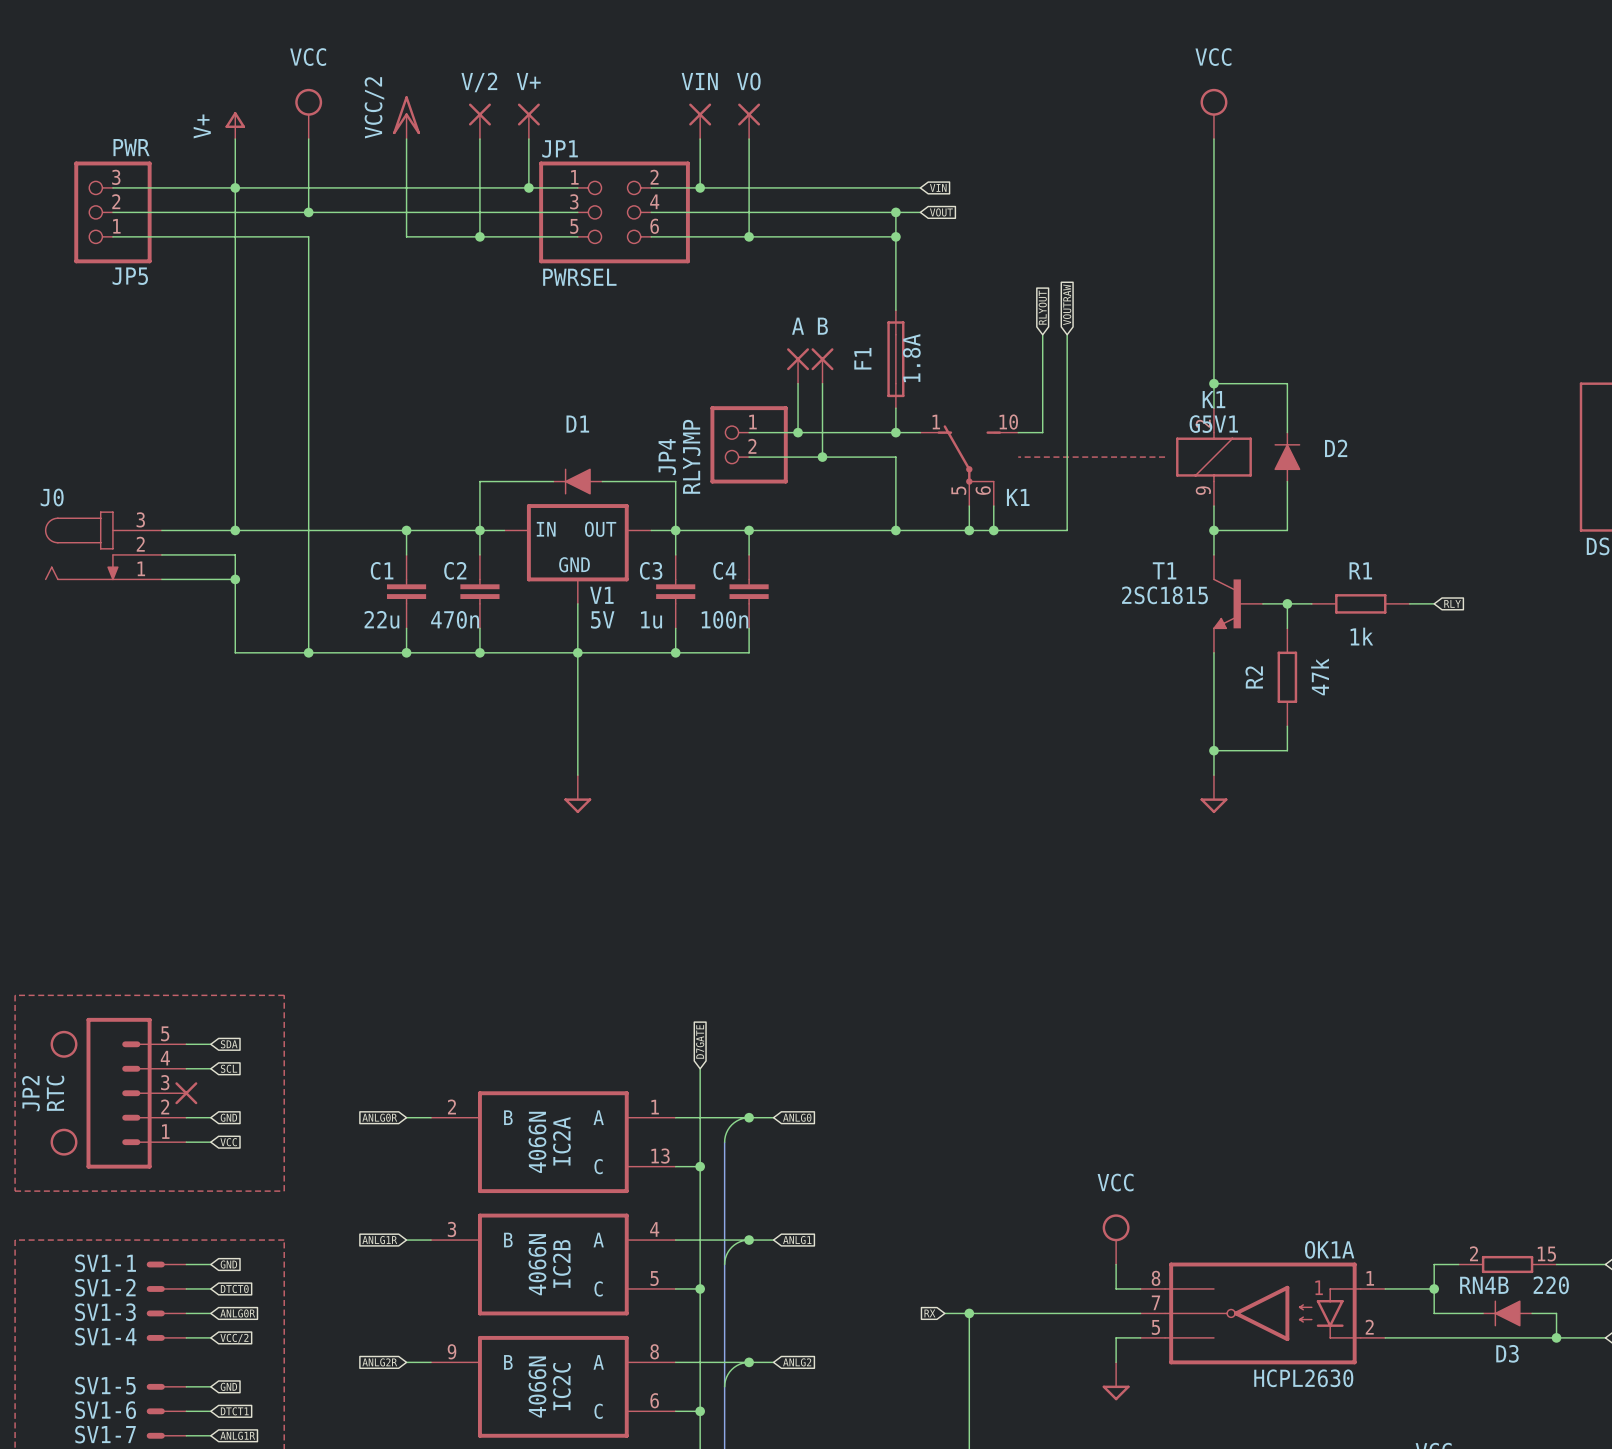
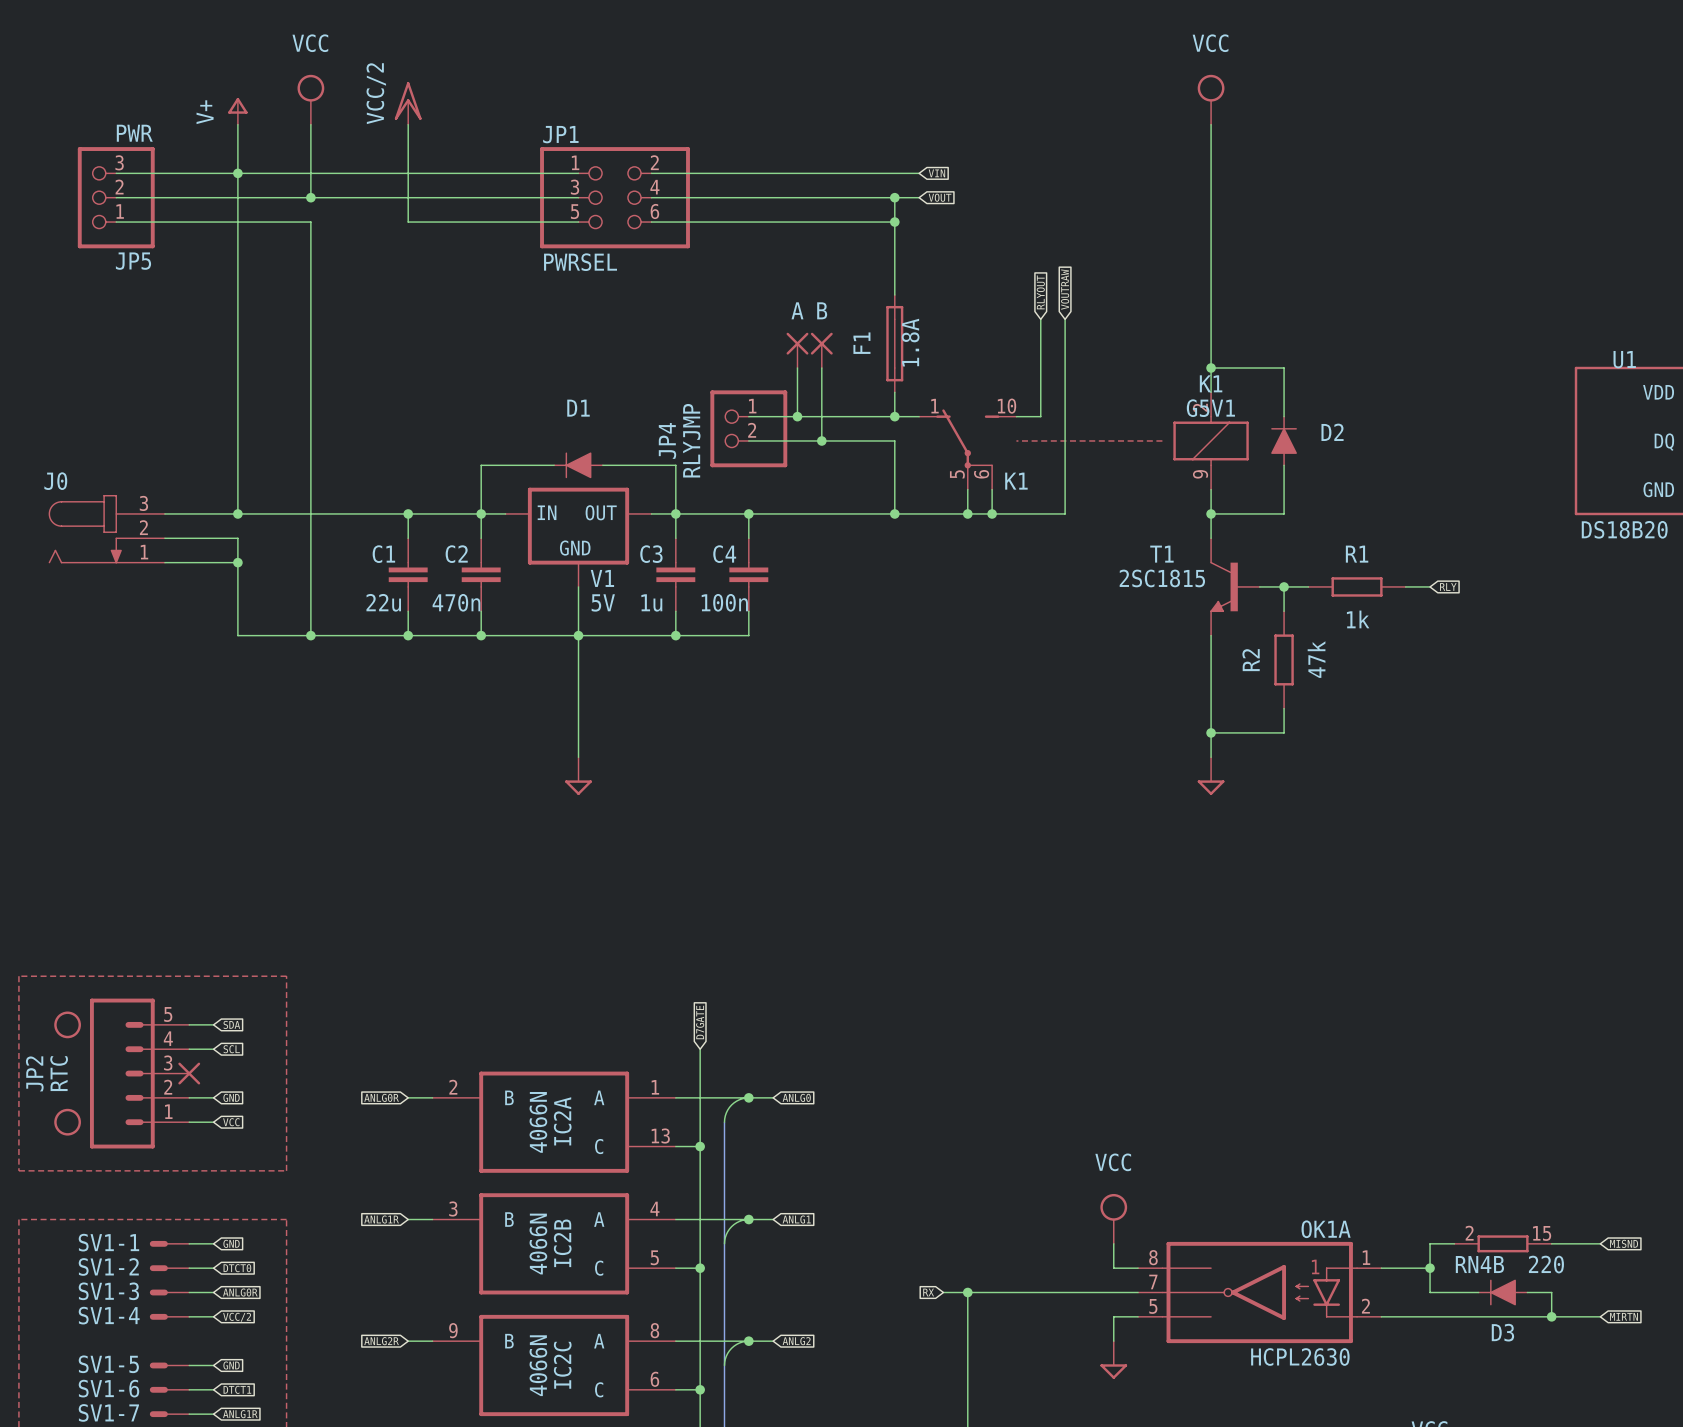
V/2: (479, 121) -> none
V+: (528, 121) -> none
VIN: (700, 121) -> none
VO: (749, 121) -> none
wire: (479, 139) (479, 236) -> none
wire: (528, 139) (528, 187) -> none
wire: (700, 139) (700, 187) -> none
wire: (749, 139) (749, 236) -> none
junction: (528, 187) -> none
junction: (700, 187) -> none
junction: (479, 236) -> none
junction: (749, 236) -> none

